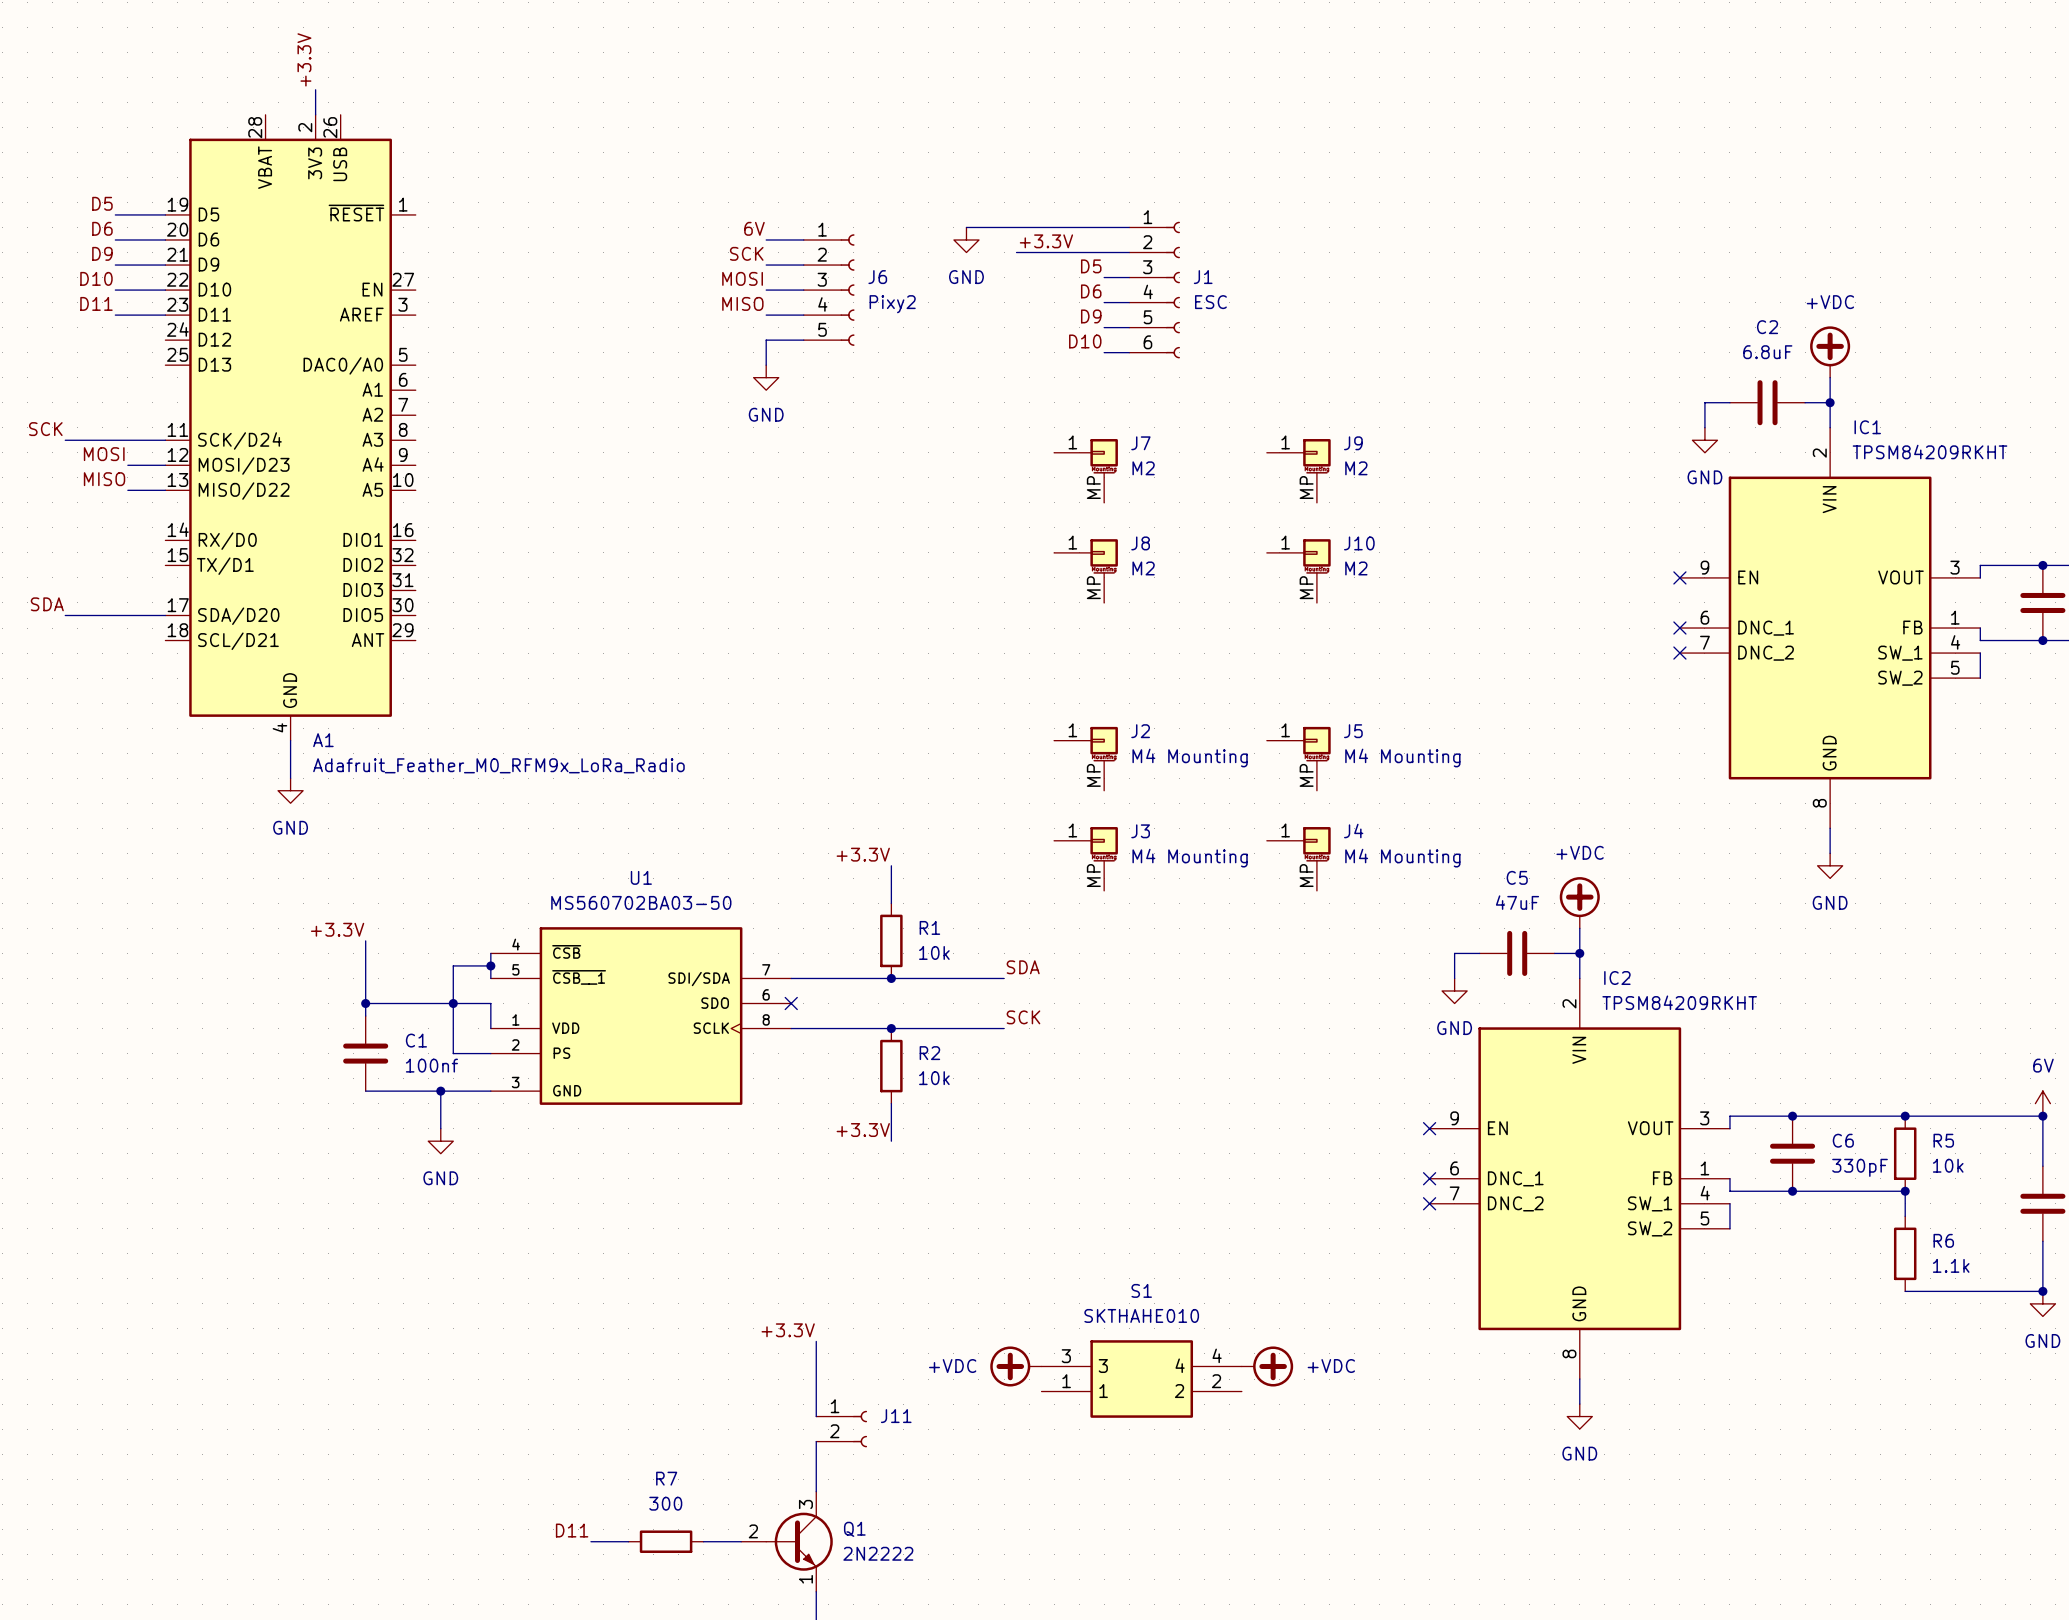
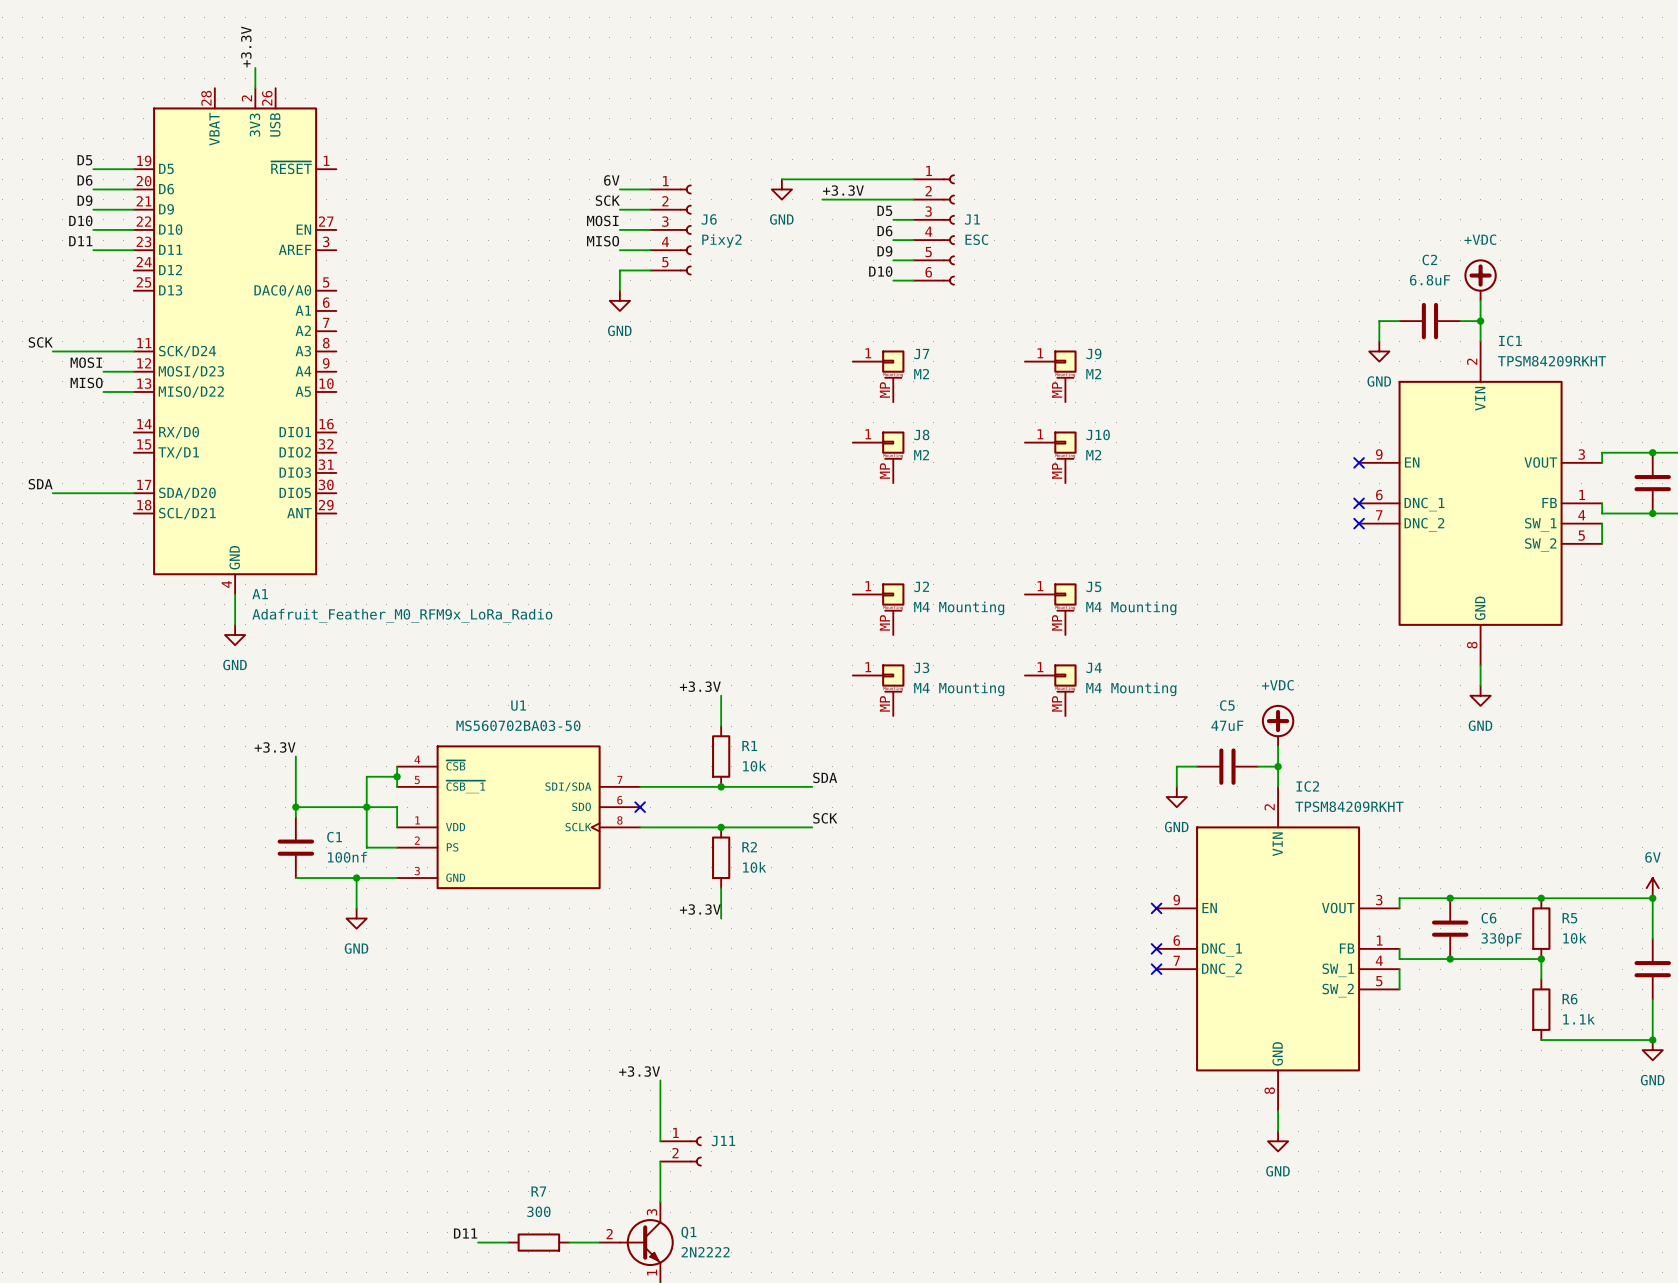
power symbol: +VDC (1015, 1366) -> none
power symbol: +VDC (1267, 1366) -> none
S1: SKTHAHE010 (1141, 1379) -> none

